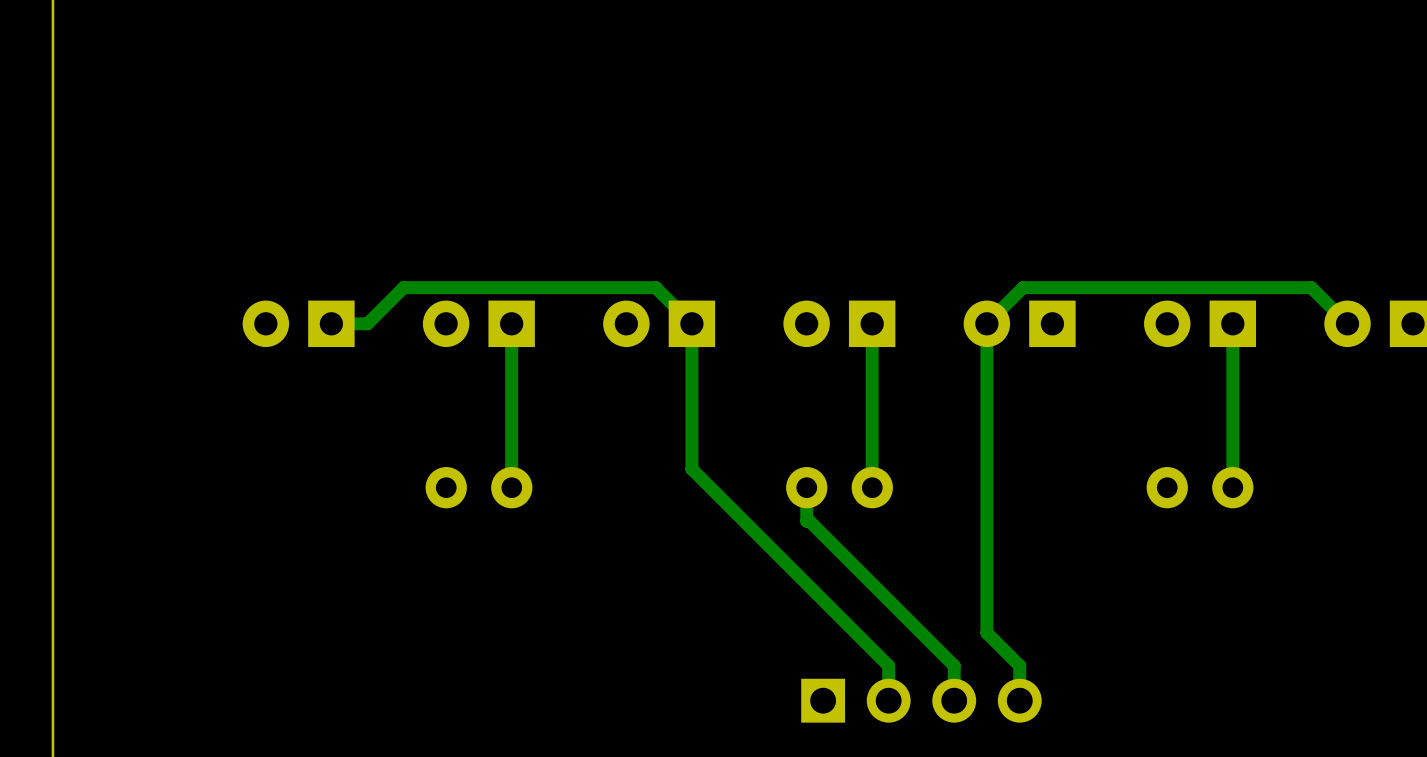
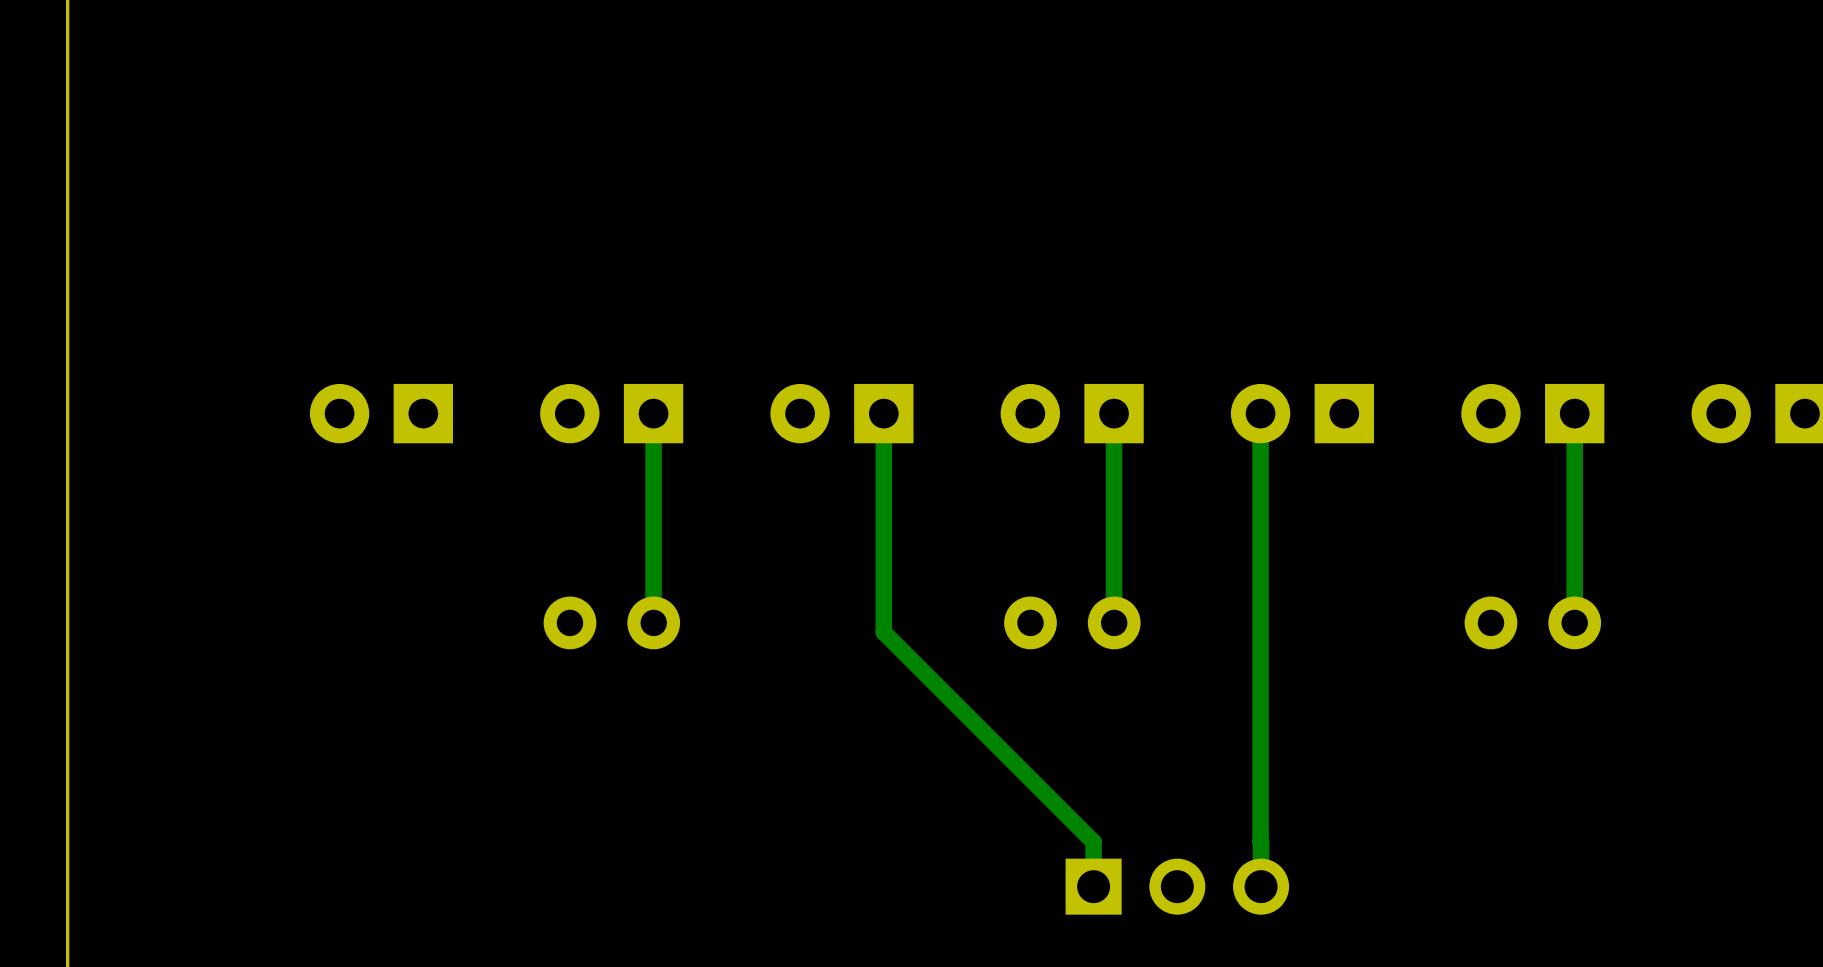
track: (691, 323) (655, 287) (403, 287) (367, 323) (331, 323) -> none
track: (1347, 323) (1311, 287) (1023, 287) (986, 323) -> none
track: (691, 469) (888, 665) (888, 700) -> (883, 599) (883, 632) (1093, 842) (1093, 886)
track: (806, 487) (806, 521) (809, 521) (954, 665) (954, 700) -> none
track: (986, 632) (1019, 665) (1019, 700) -> (1260, 808) (1261, 886)
part footprint: [801, 678, 1042, 723] -> [1065, 858, 1290, 915]

